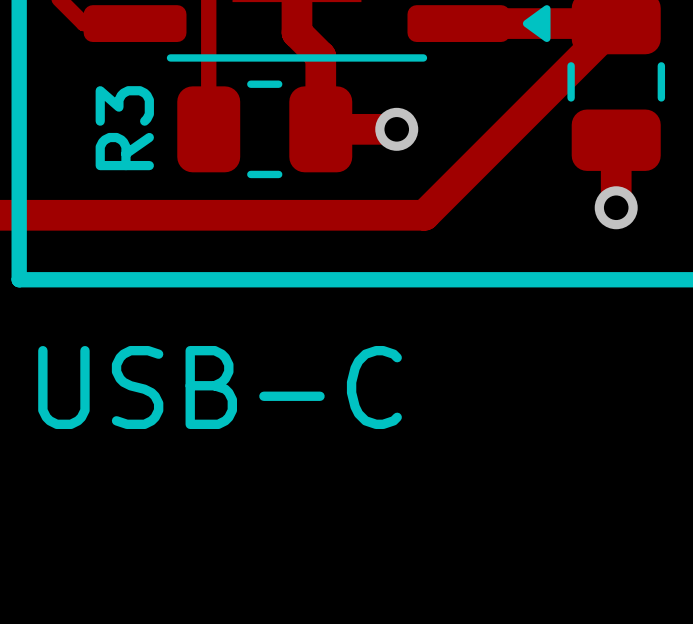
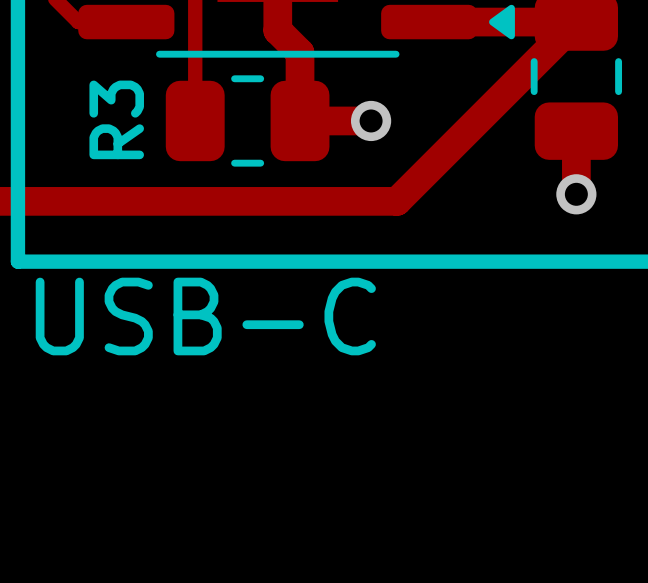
text position: USB-C (220, 387) -> USB-C (205, 316)

